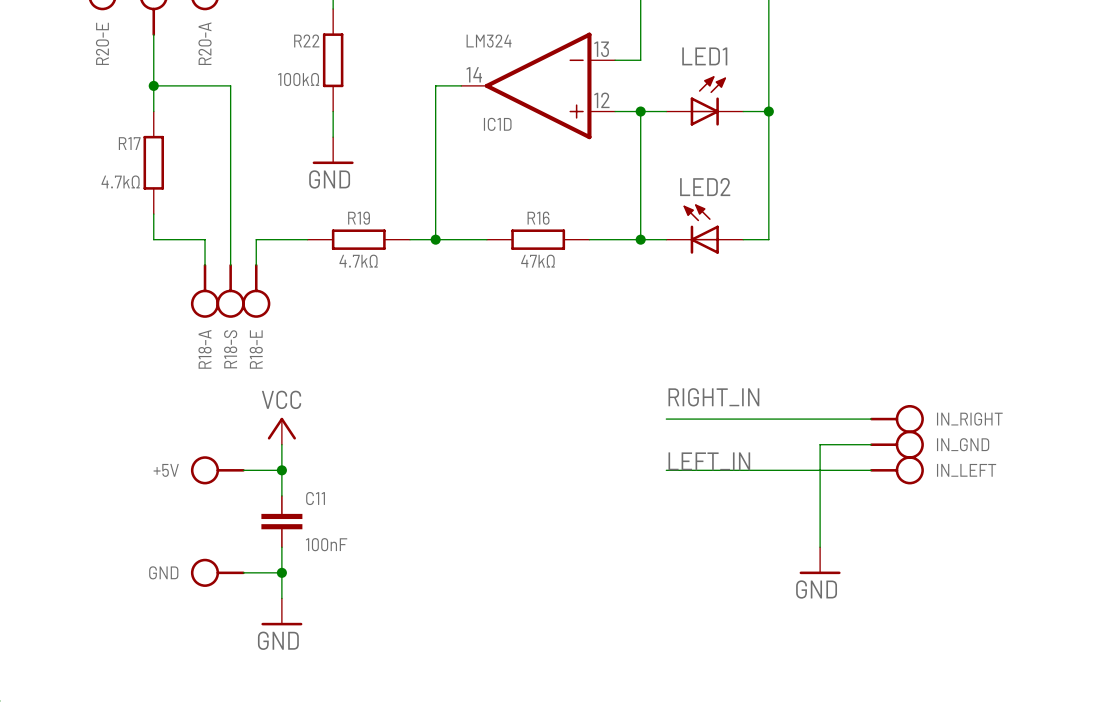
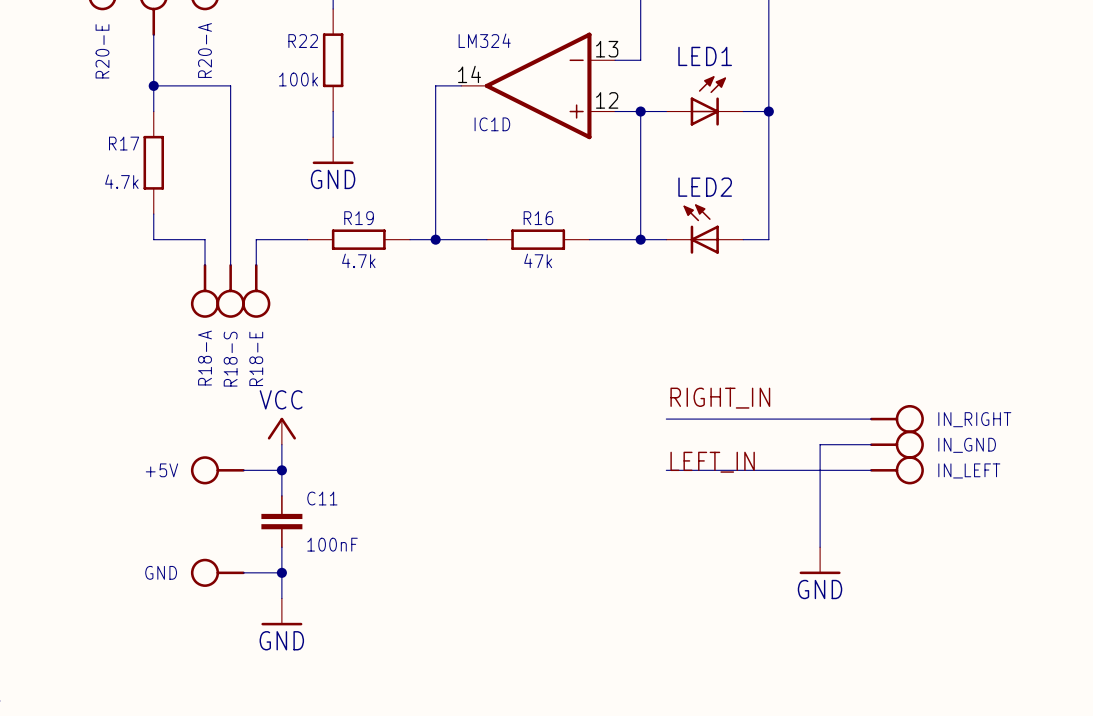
R22 value: 100kΩ (298, 79) -> 100k (298, 79)
R17 value: 4.7kΩ (120, 181) -> 4.7k (121, 181)
R19 value: 4.7kΩ (358, 261) -> 4.7k (358, 260)
R16 value: 47kΩ (537, 261) -> 47k (538, 260)

